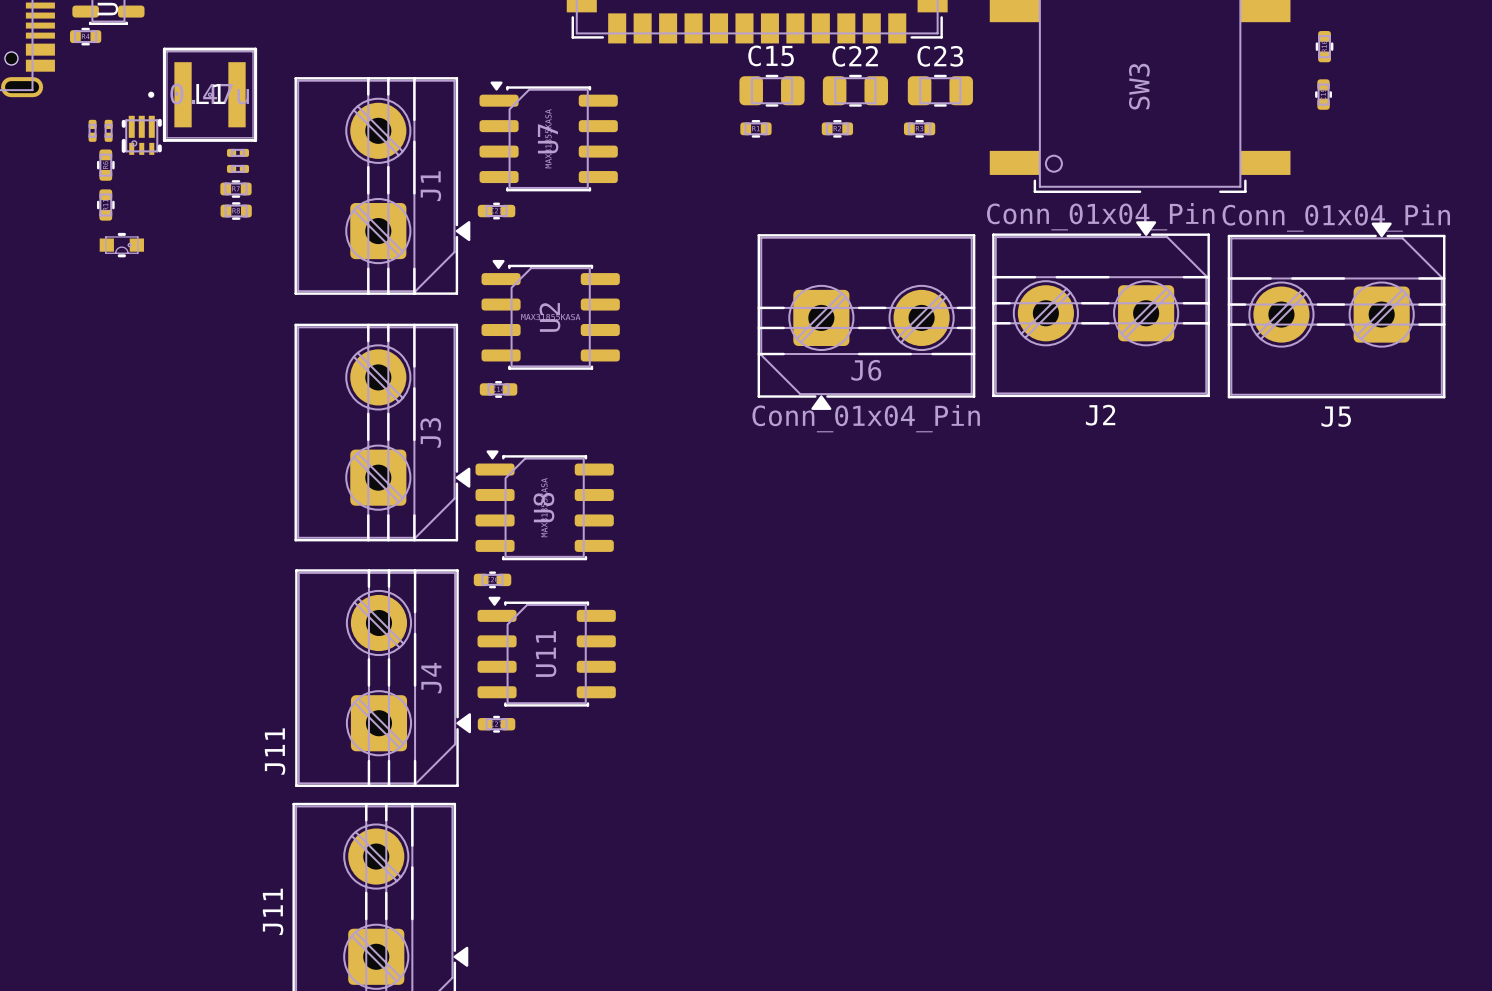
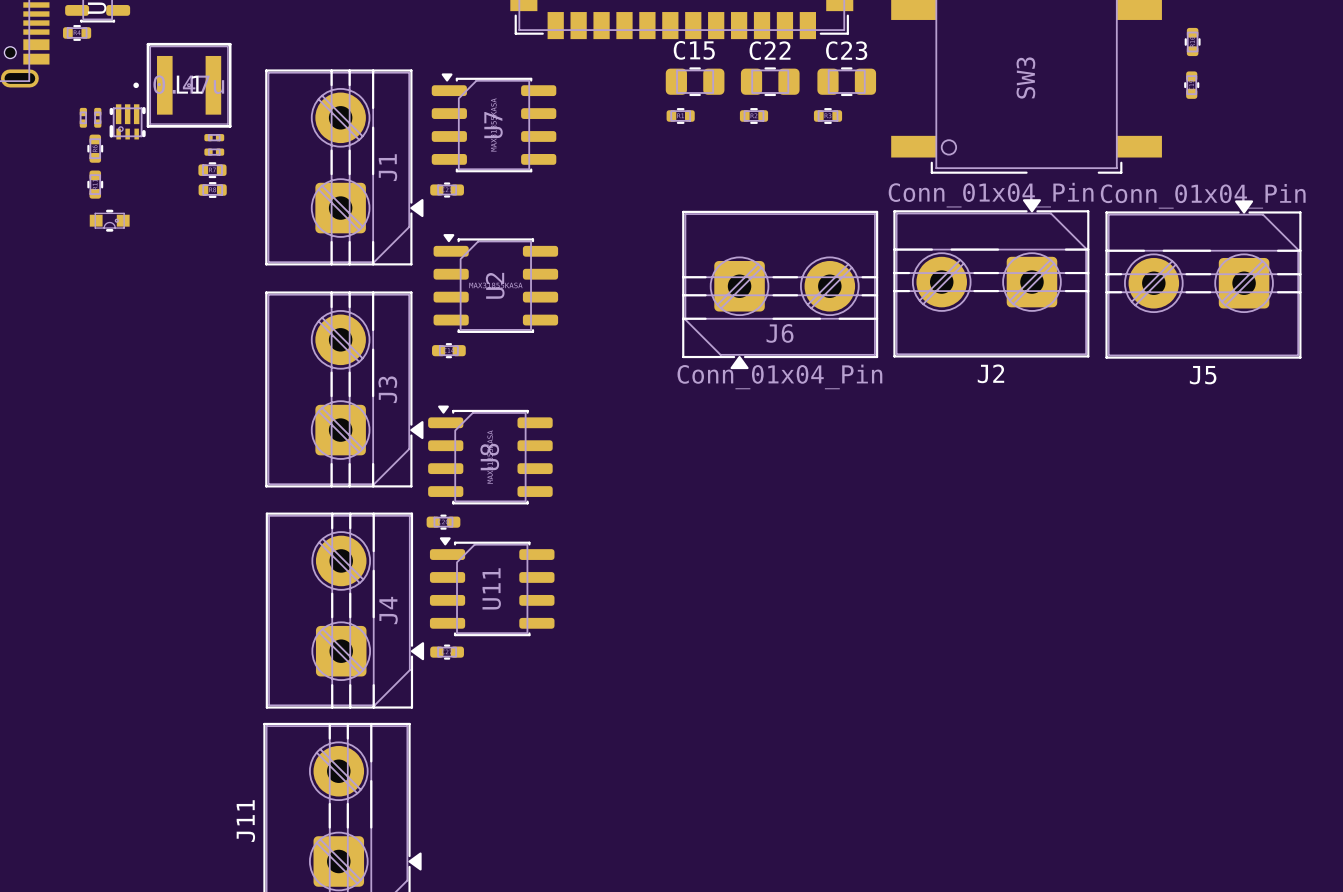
text: J11 (275, 751) -> none

